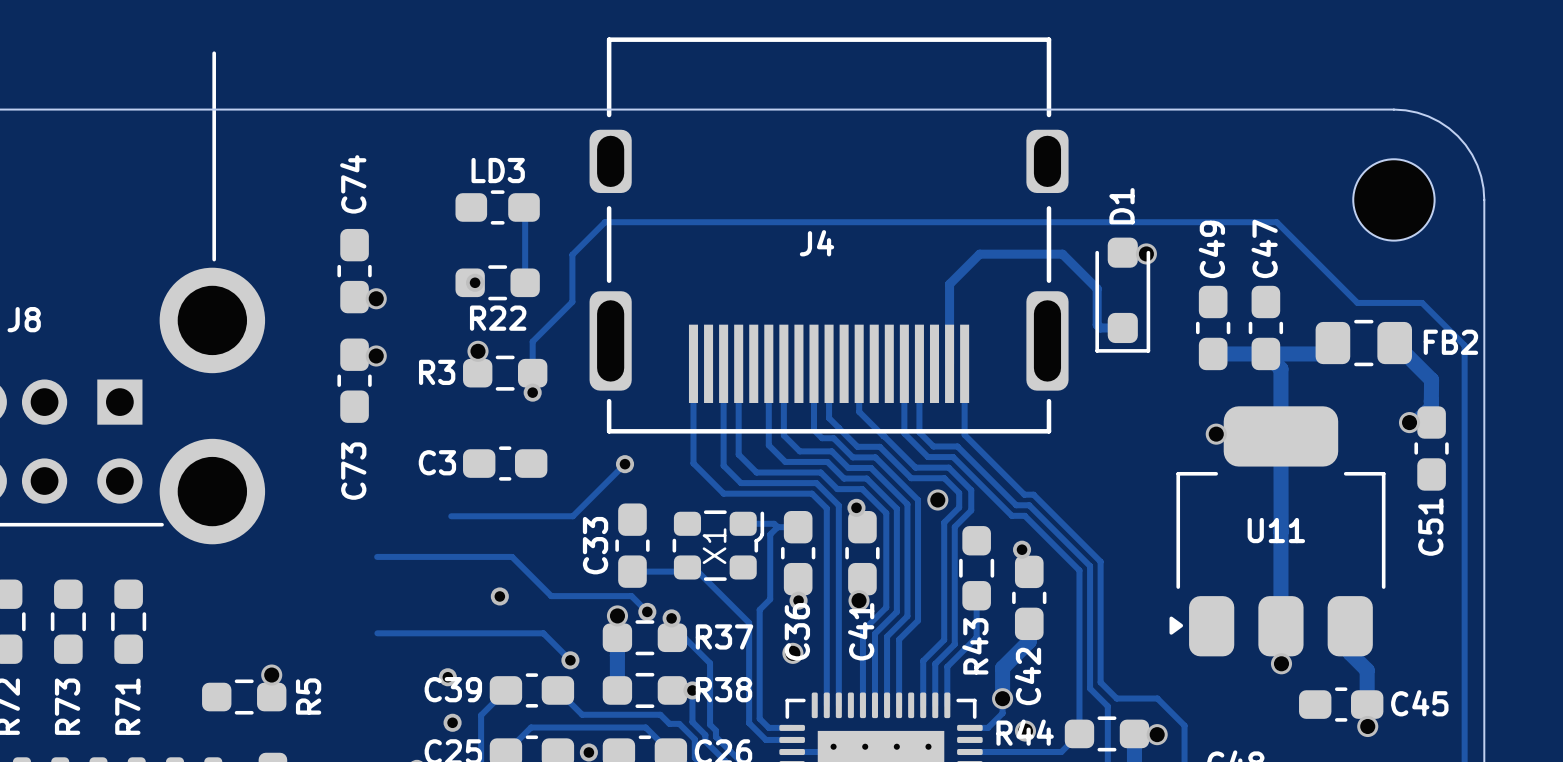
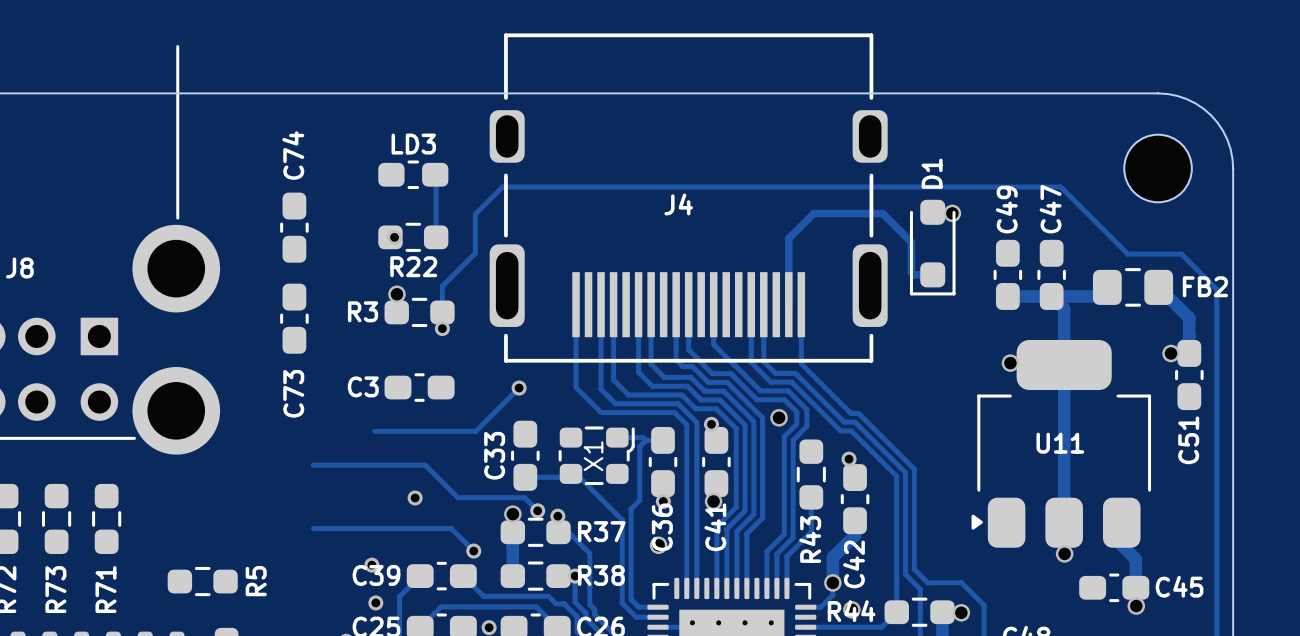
via: (376, 298) -> none
via: (376, 355) -> none
via: (271, 675) -> none

